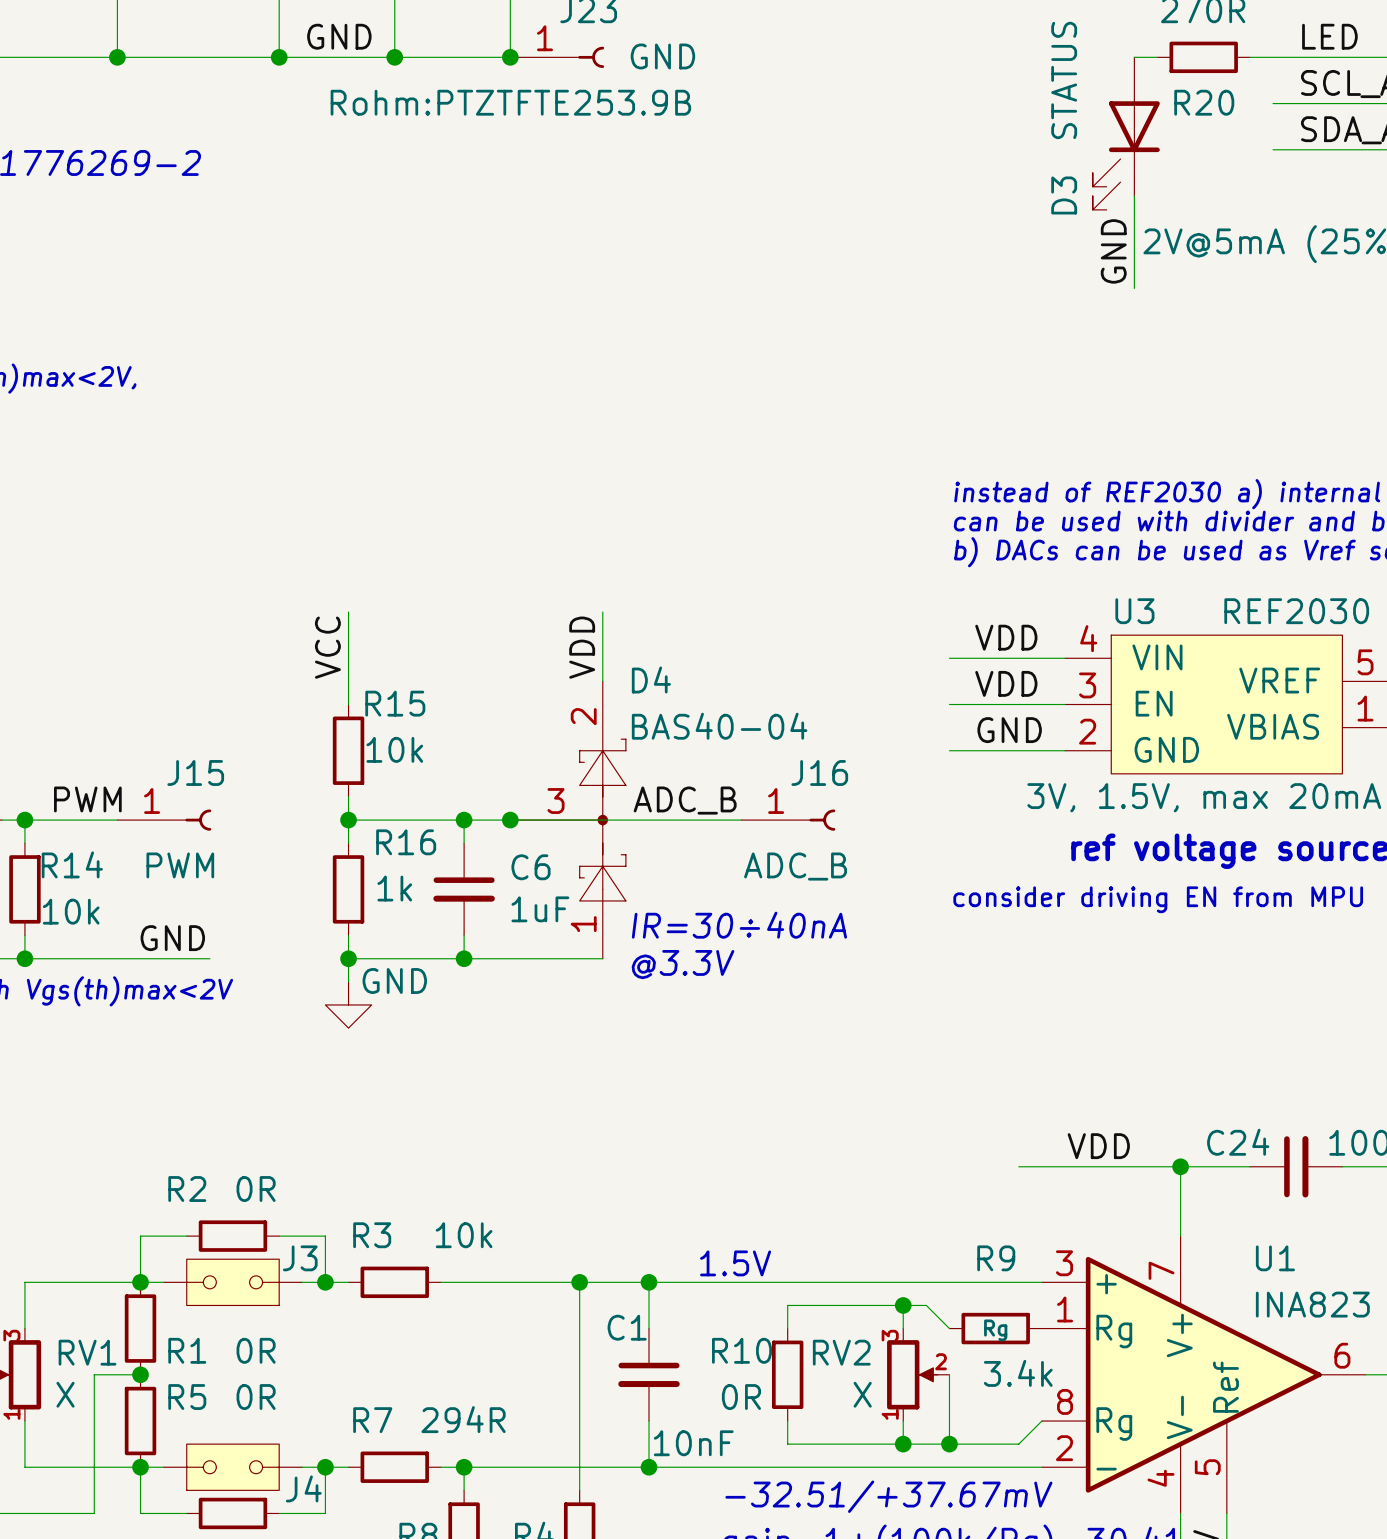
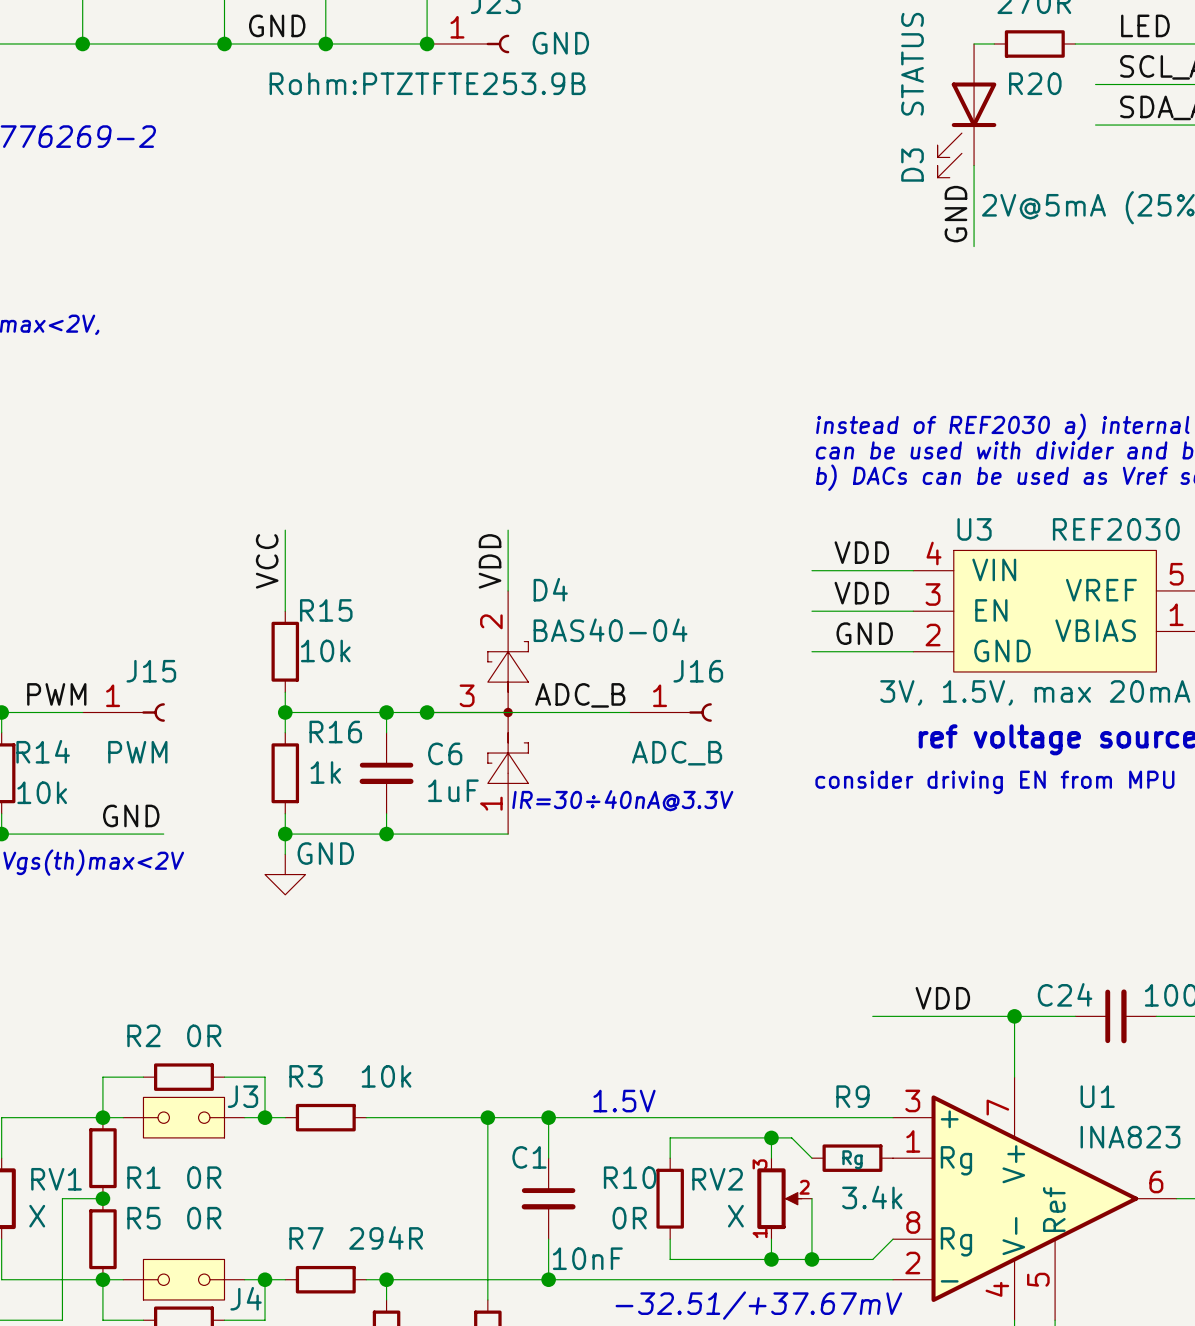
text: IR=30÷40nA (739, 925) -> IR=30÷40nA@3.3V (622, 800)
text: @3.3V (683, 964) -> none

